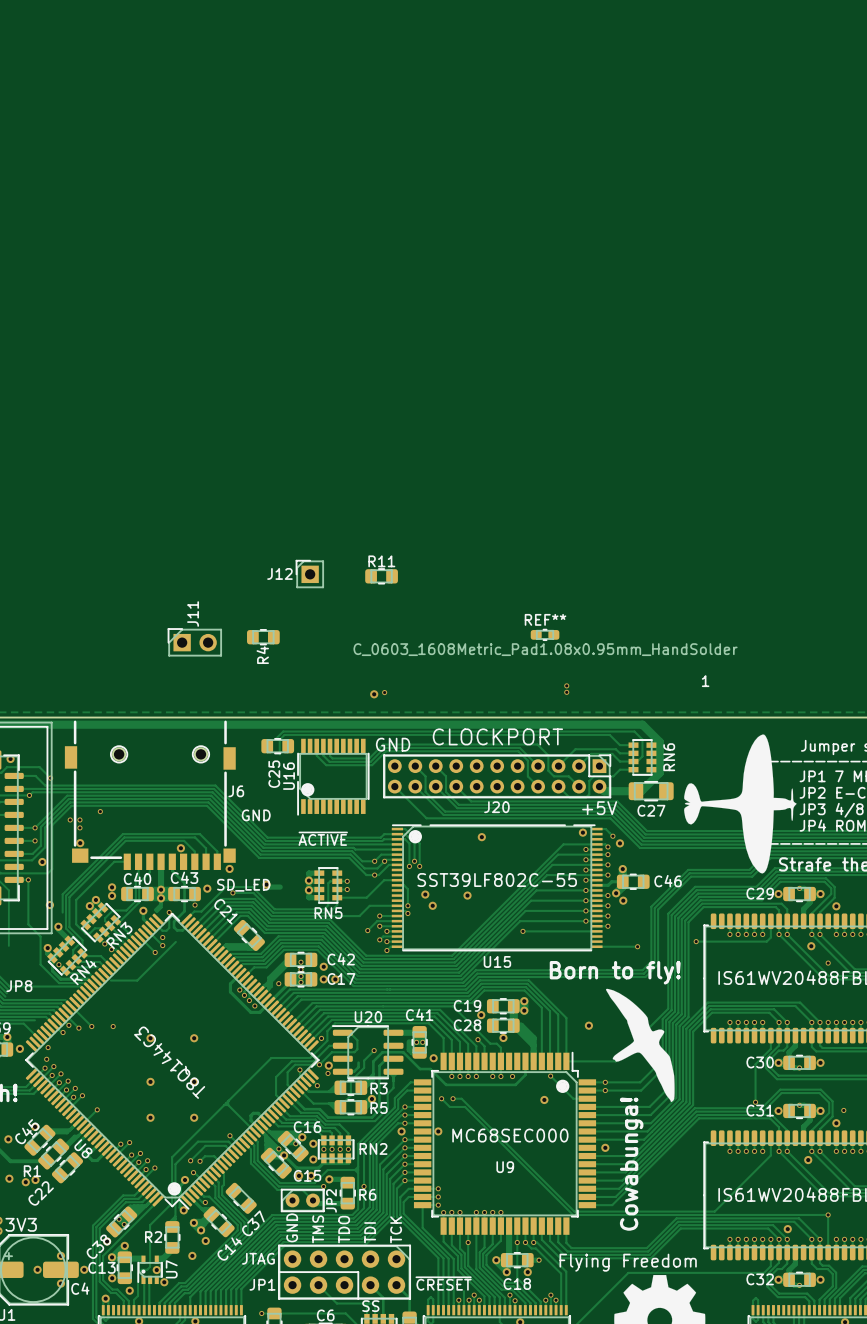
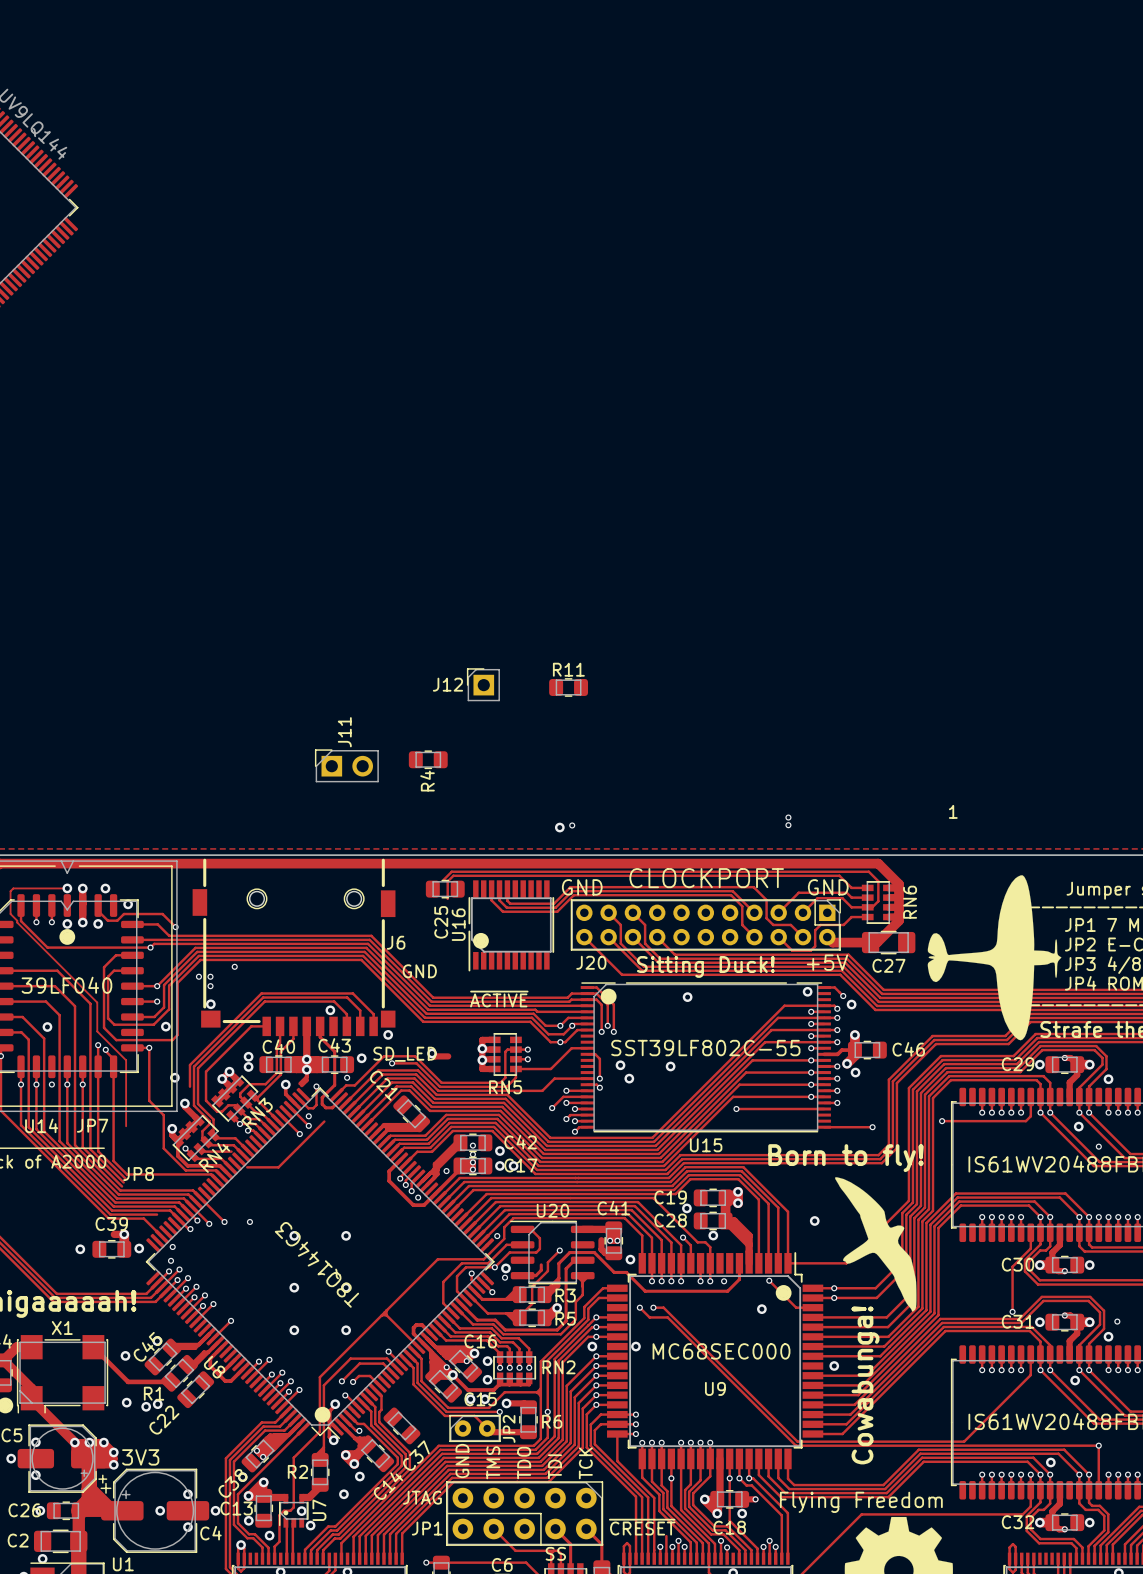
REF**: C_0603_1608Metric_Pad1.08x0.95mm_HandSolder (545, 634) -> none
text: none -> GND (828, 887)
J20 name position: J20 (496, 807) -> J20 (591, 962)
text: none -> Sitting Duck! (705, 966)

